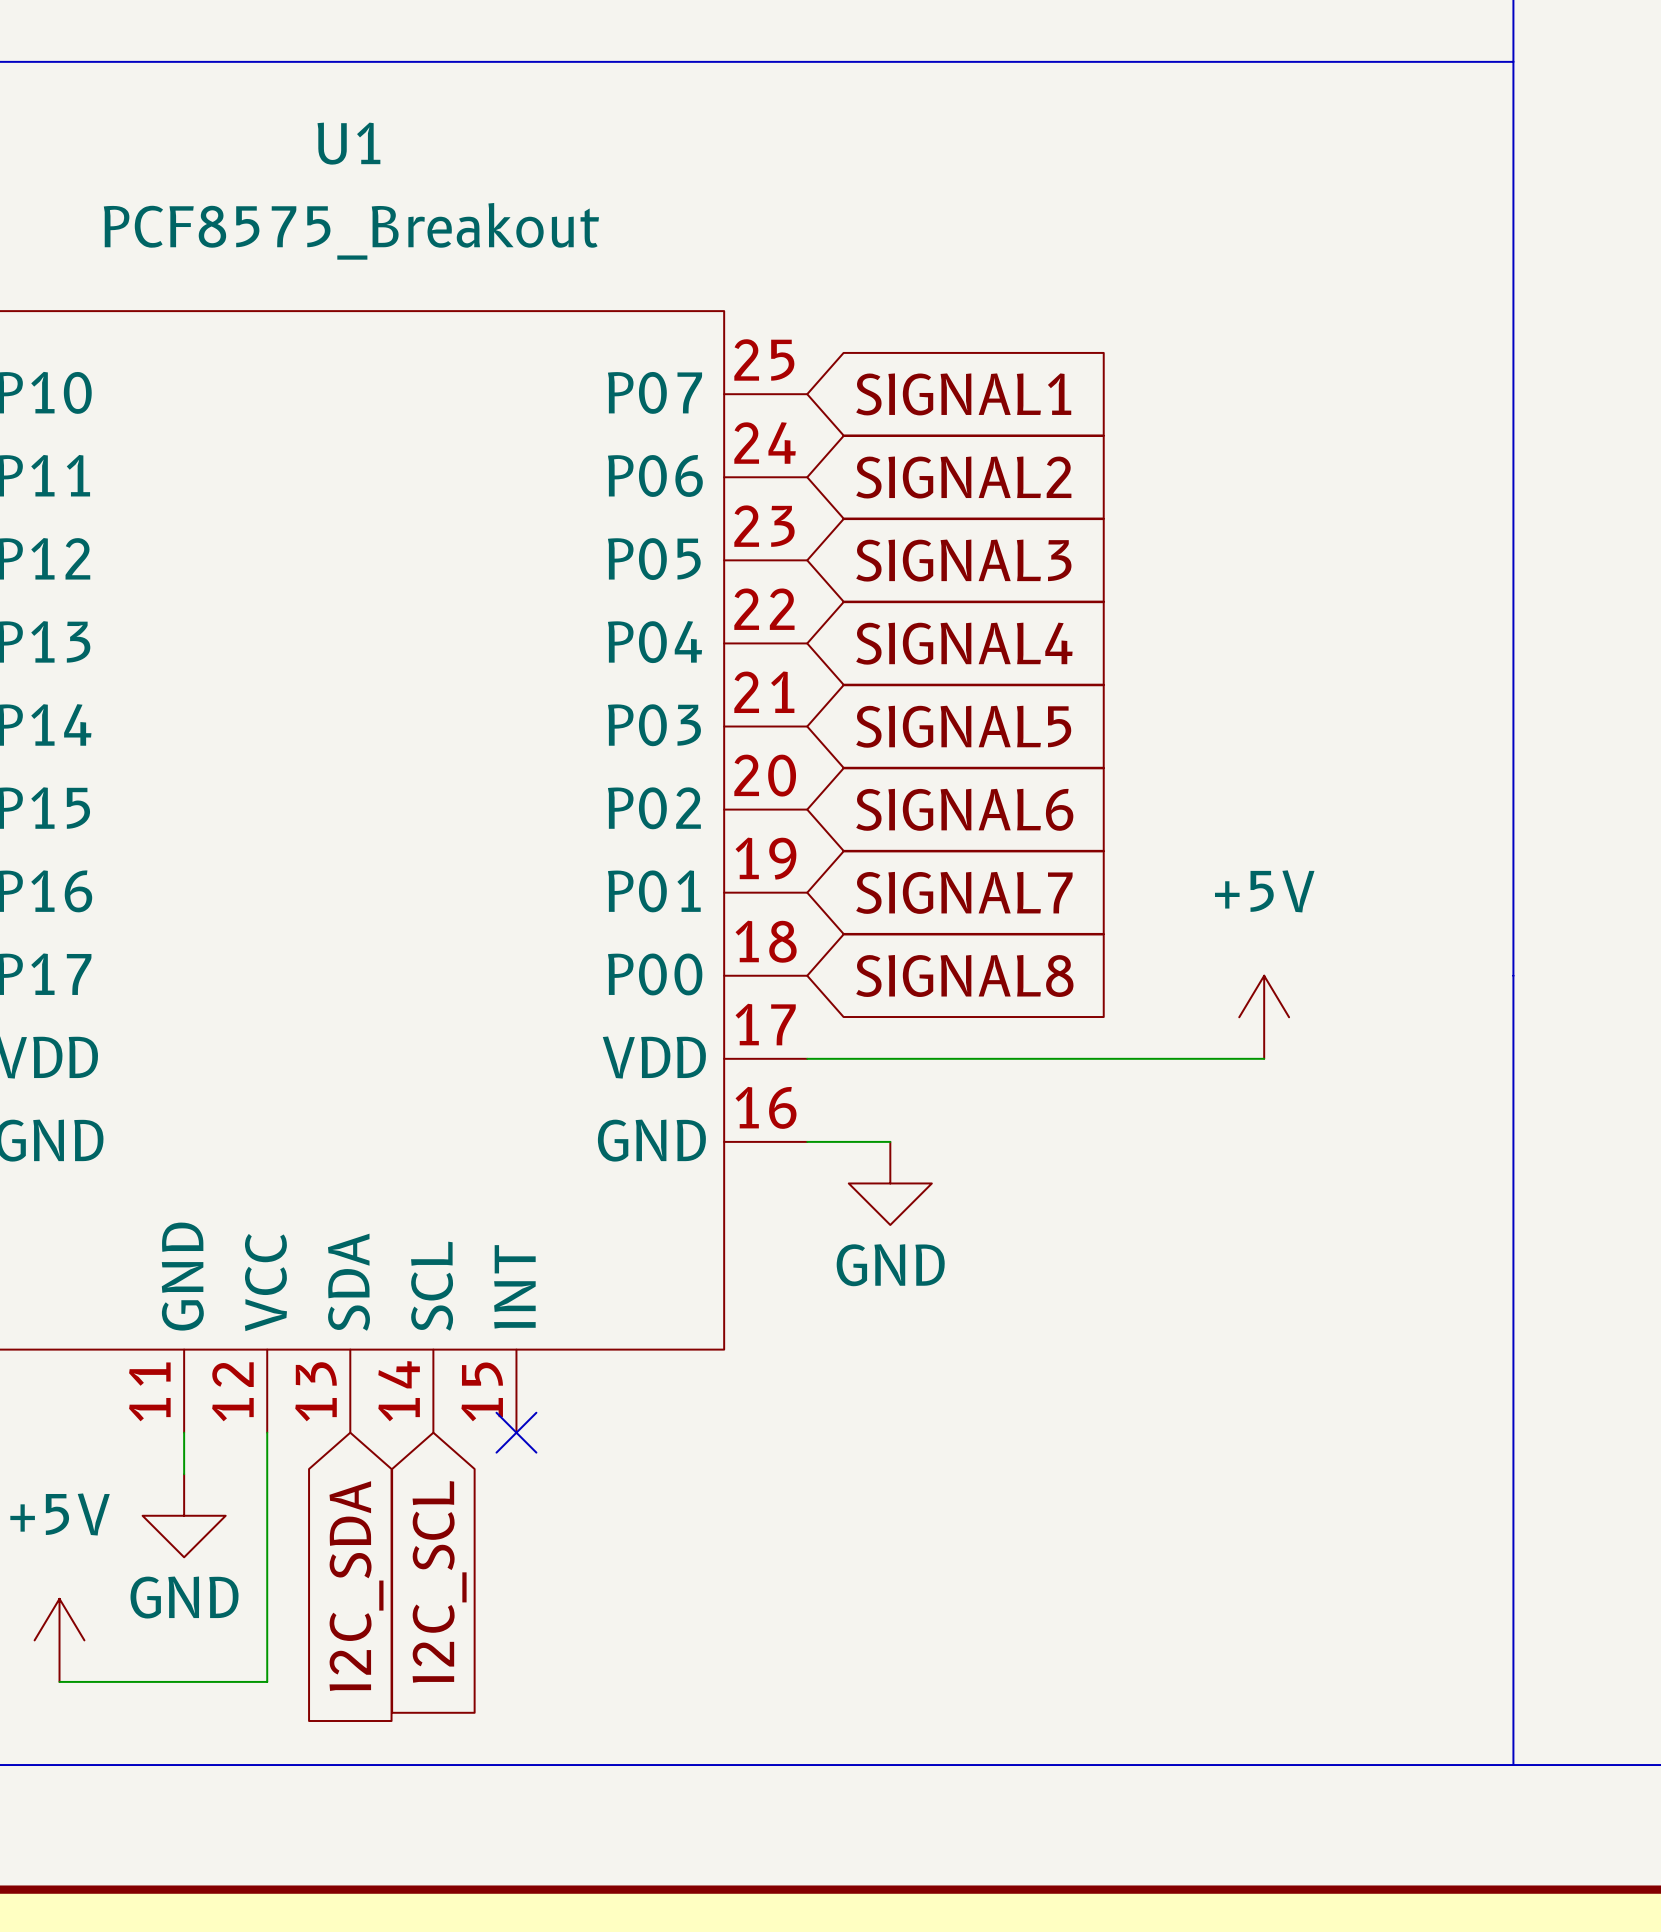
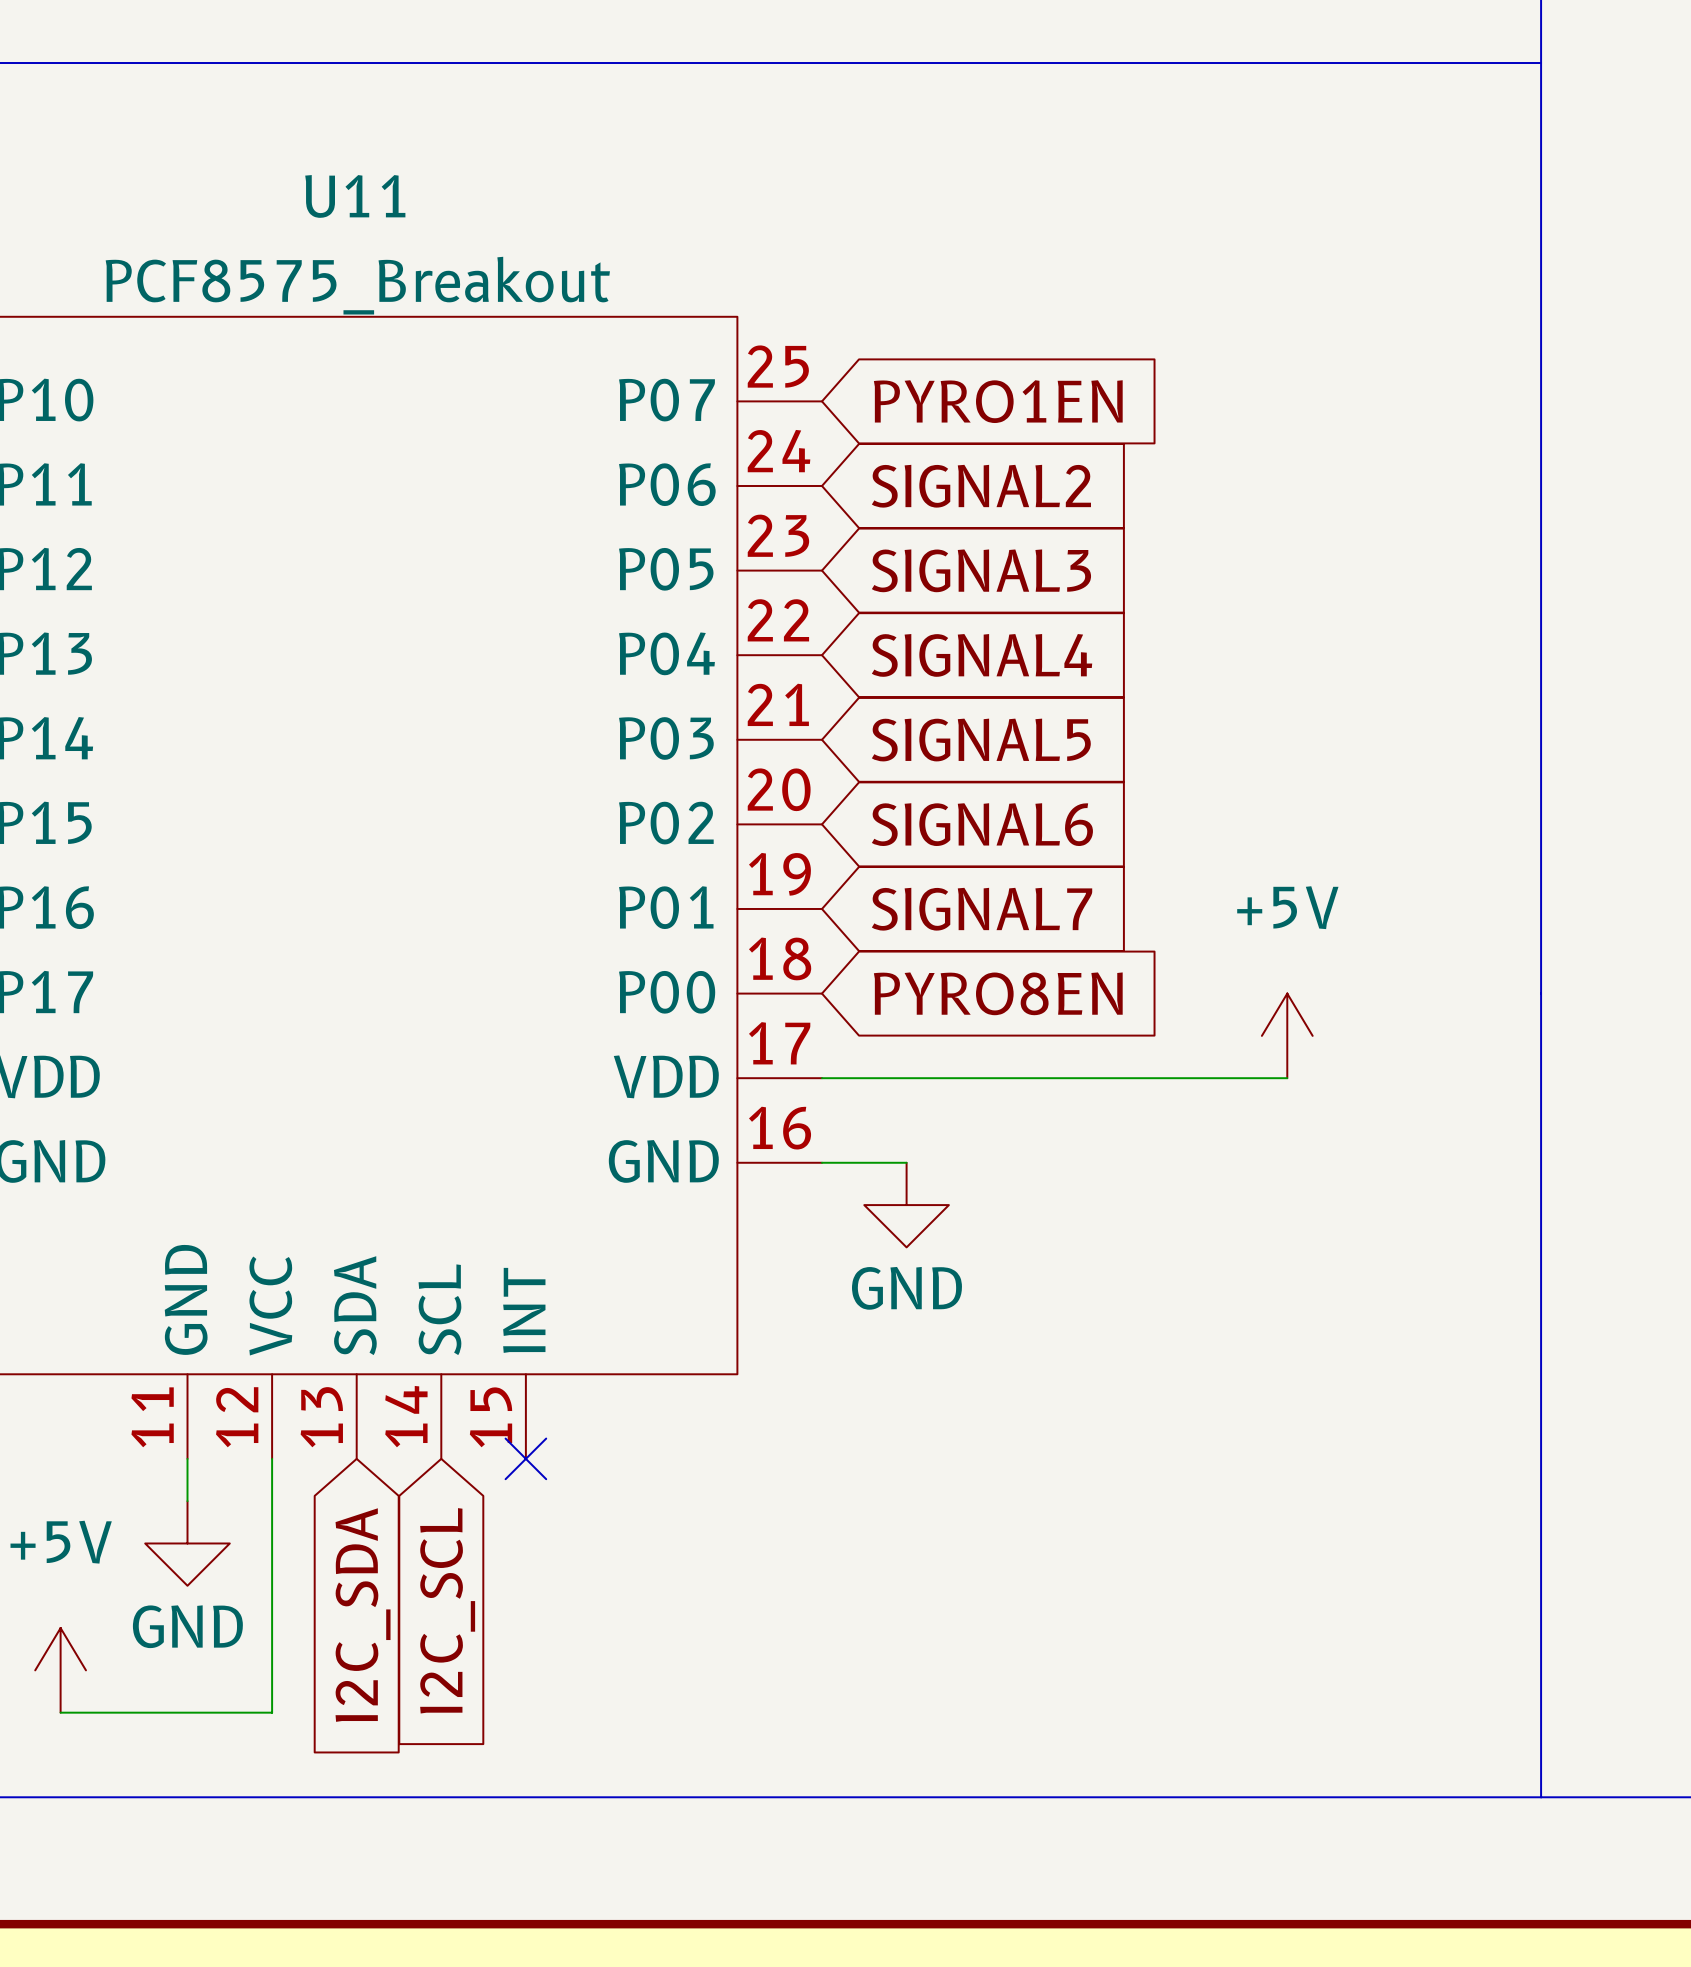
U1 name: U1 (348, 143) -> U11 (355, 196)
U1 value position: PCF8575_Breakout (351, 231) -> PCF8575_Breakout (357, 285)
global label: SIGNAL1 (963, 394) -> PYRO1EN (998, 401)
global label: SIGNAL8 (964, 975) -> PYRO8EN (998, 993)

